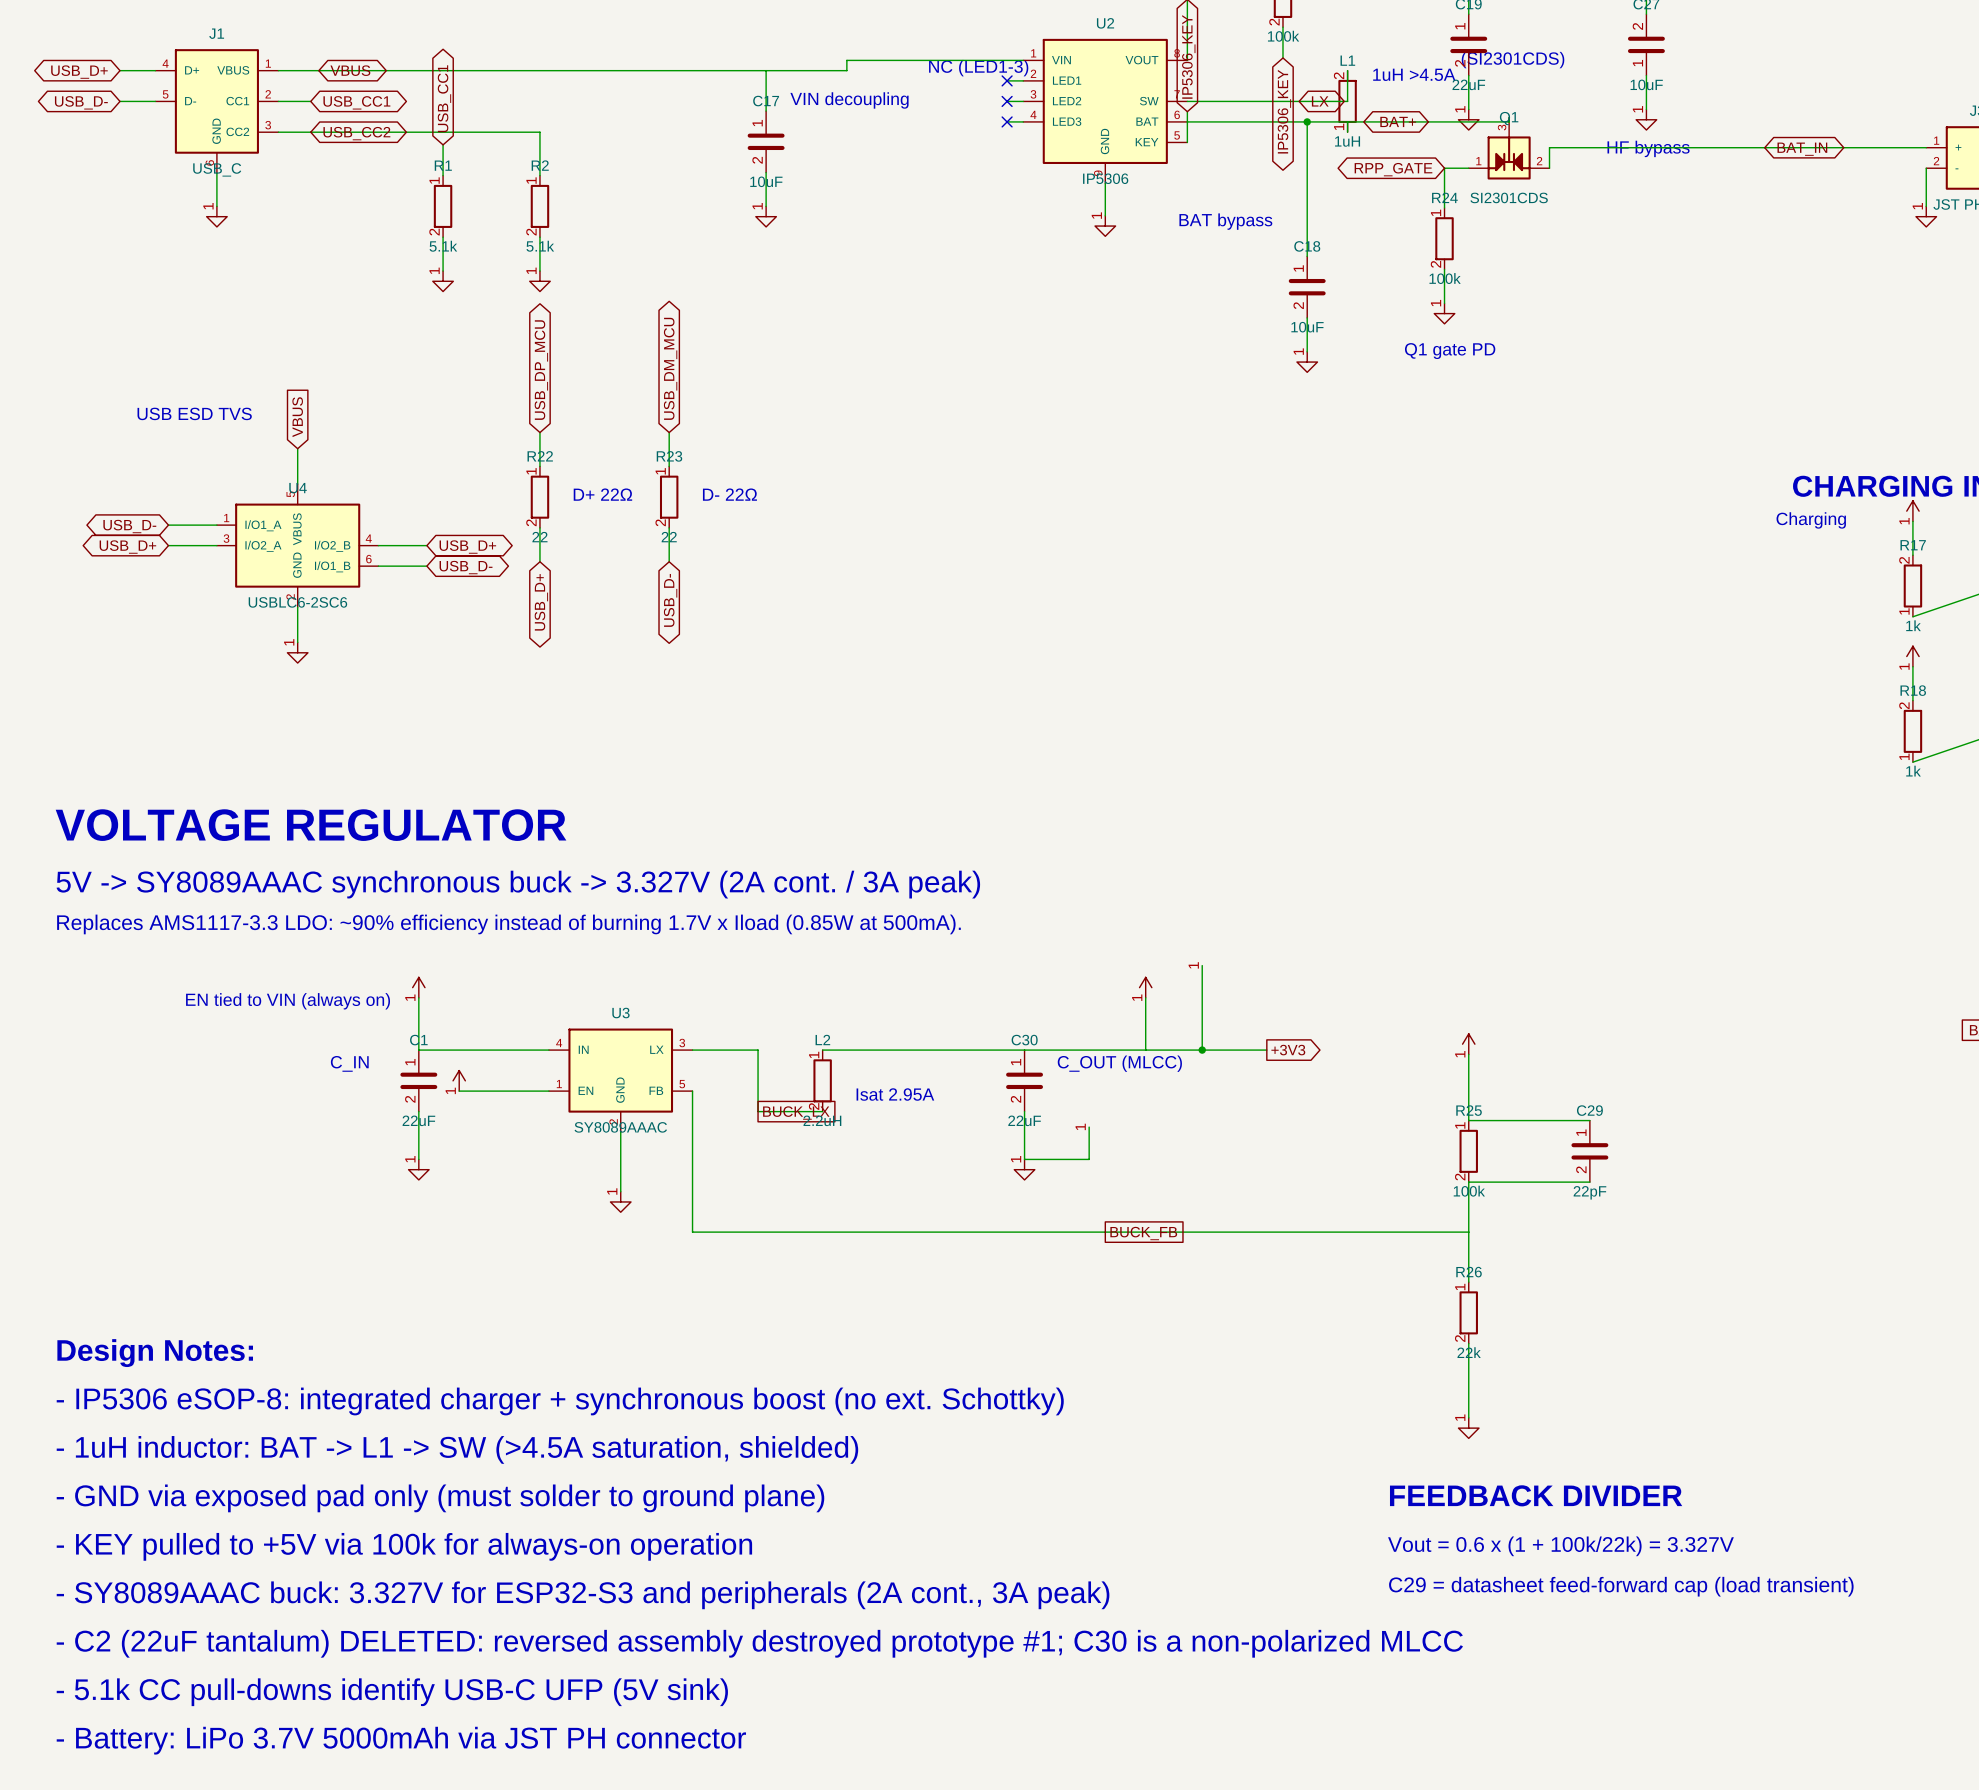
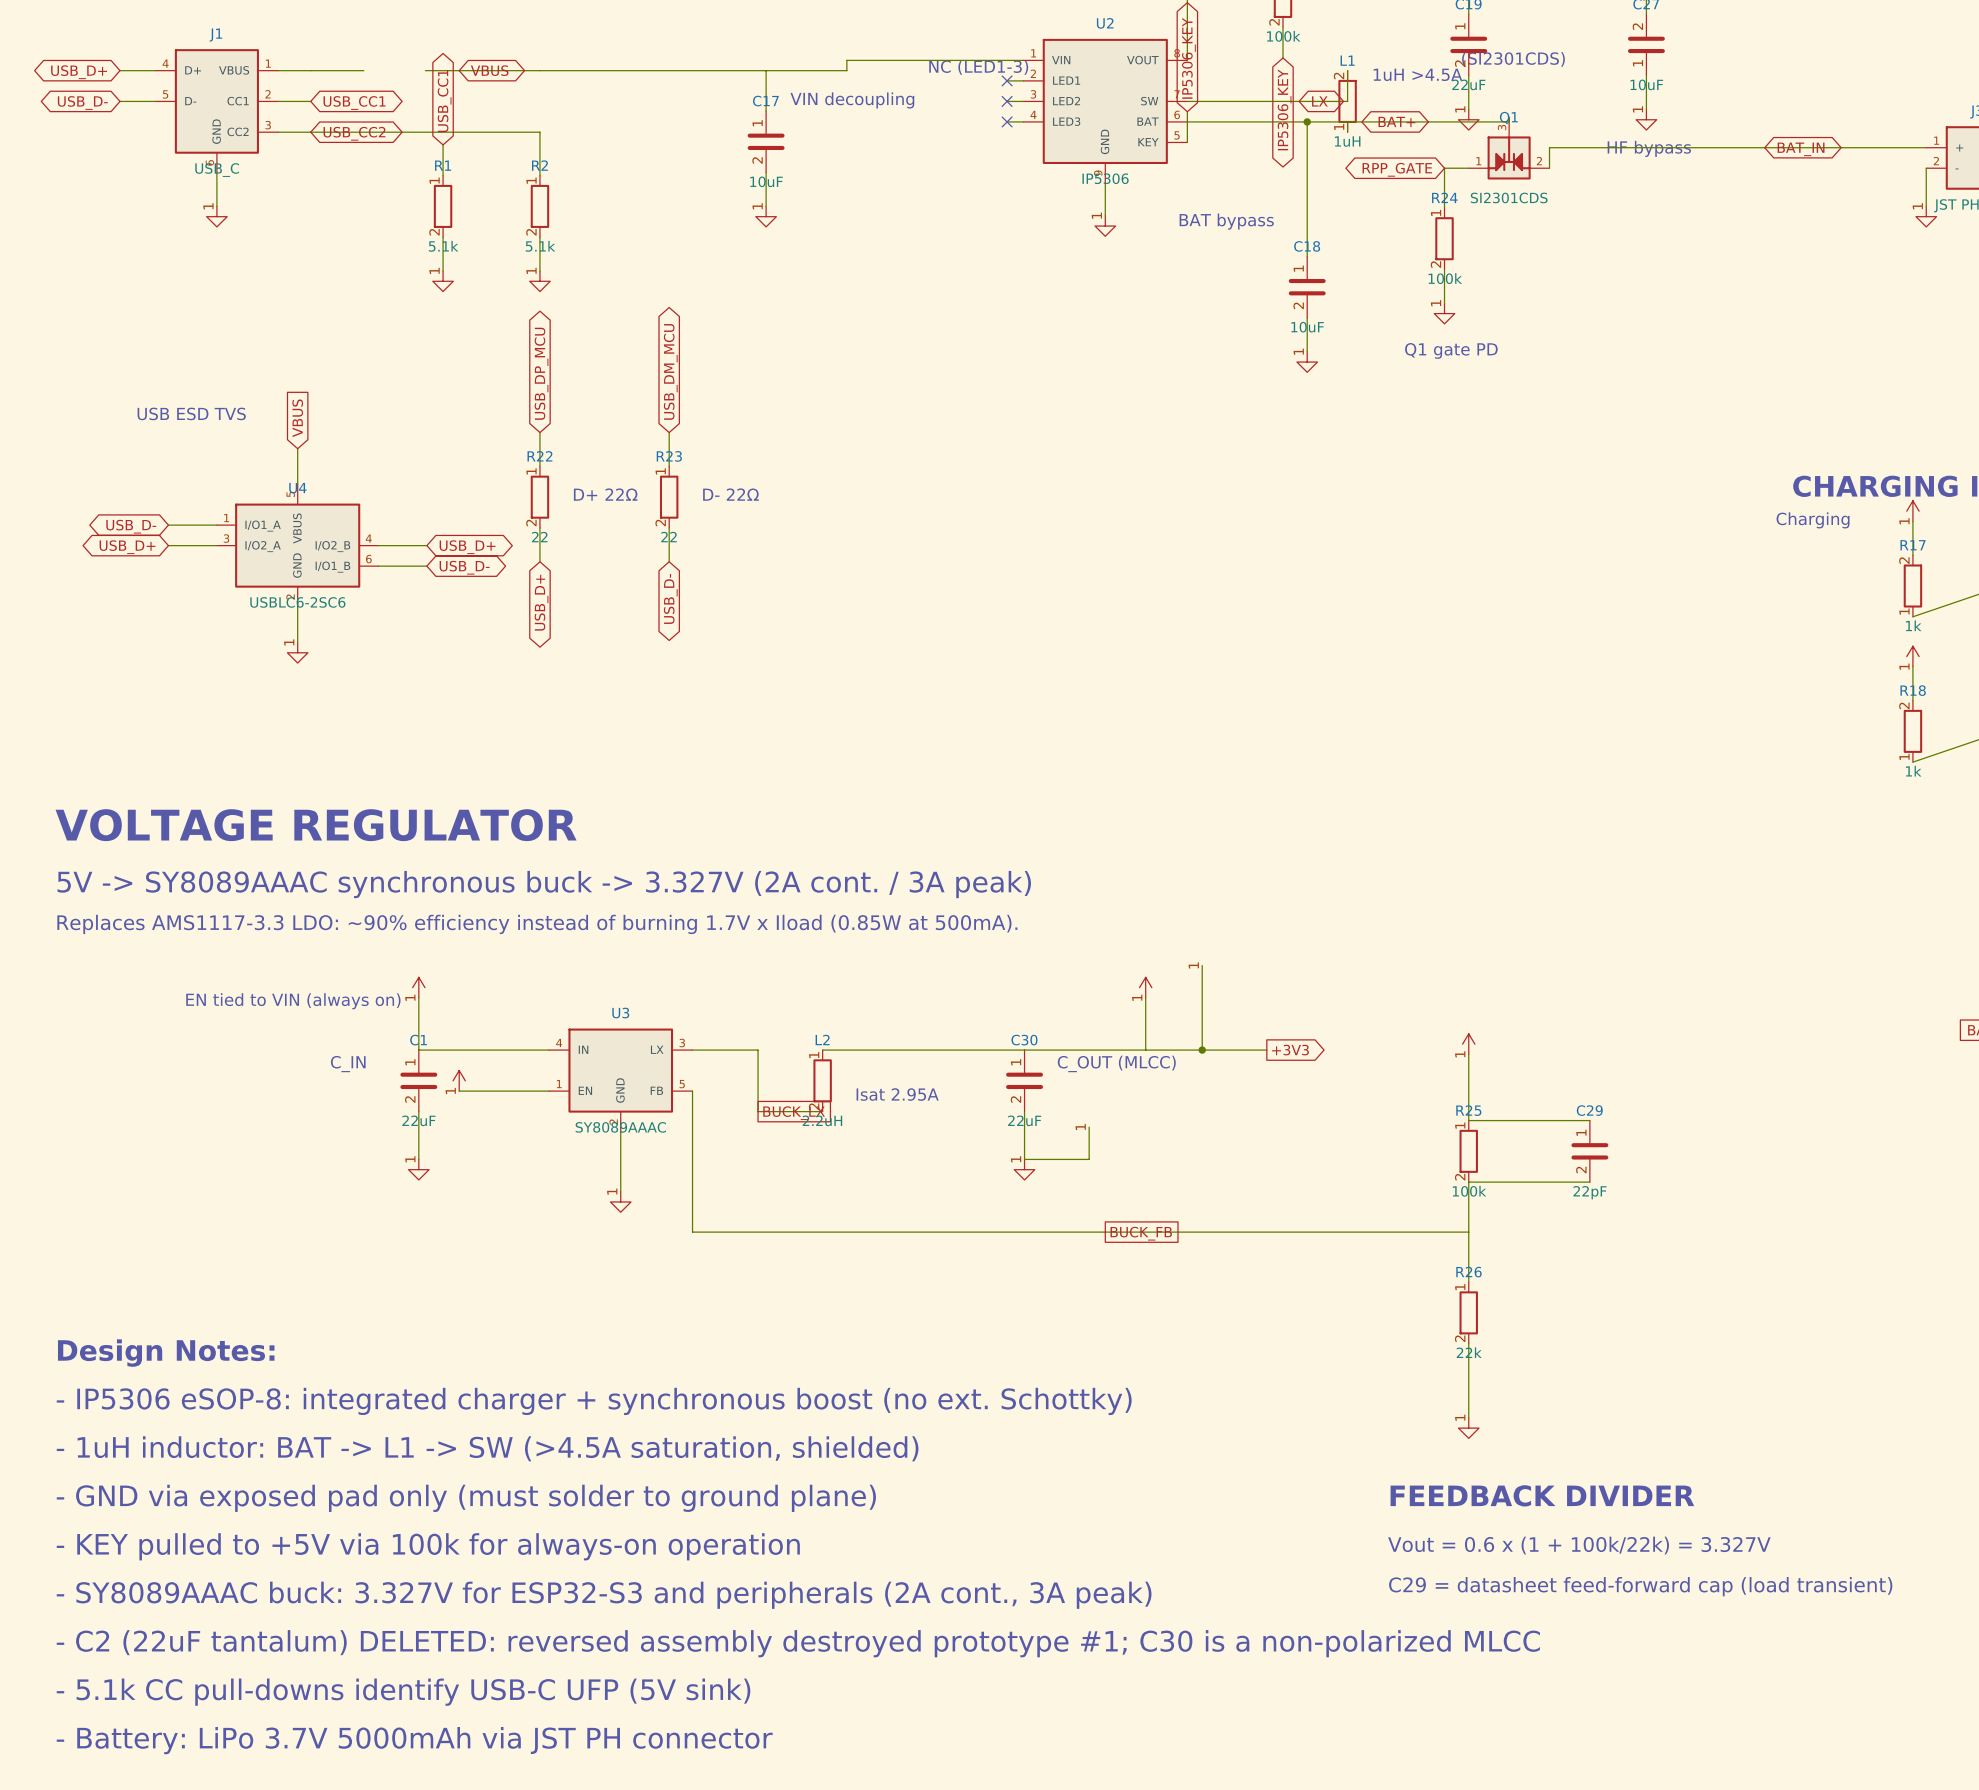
global label position: VBUS (350, 70) -> VBUS (489, 70)
wire: (363, 70) (425, 70) -> none

